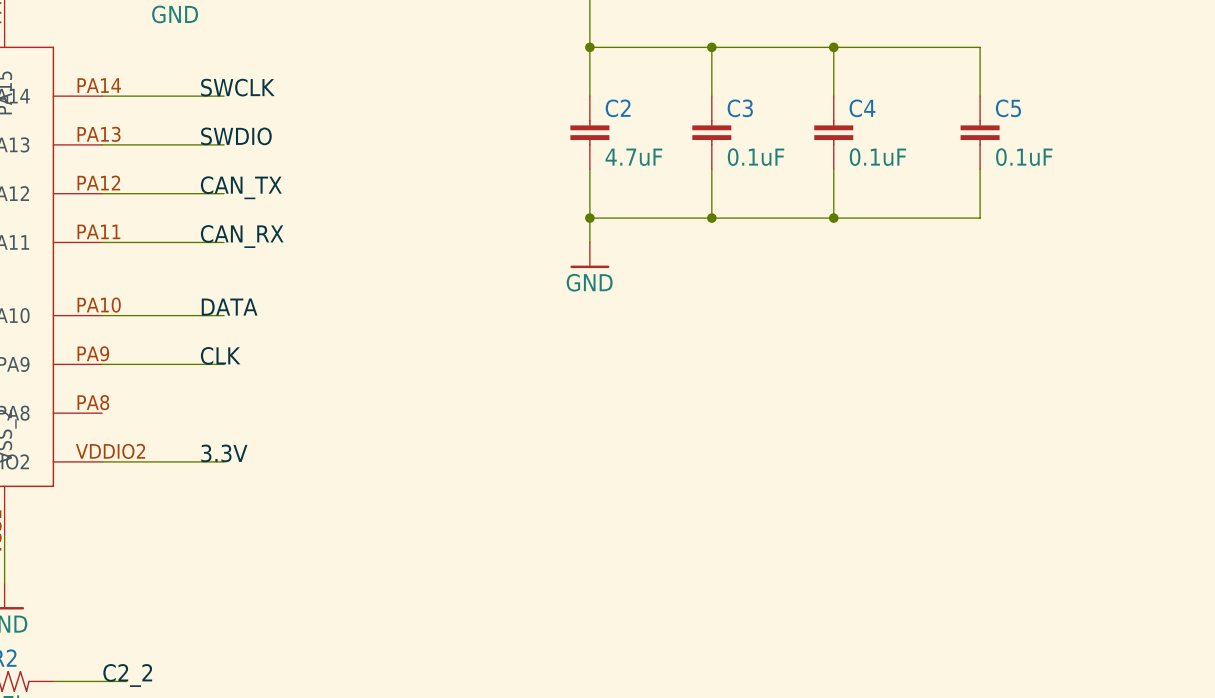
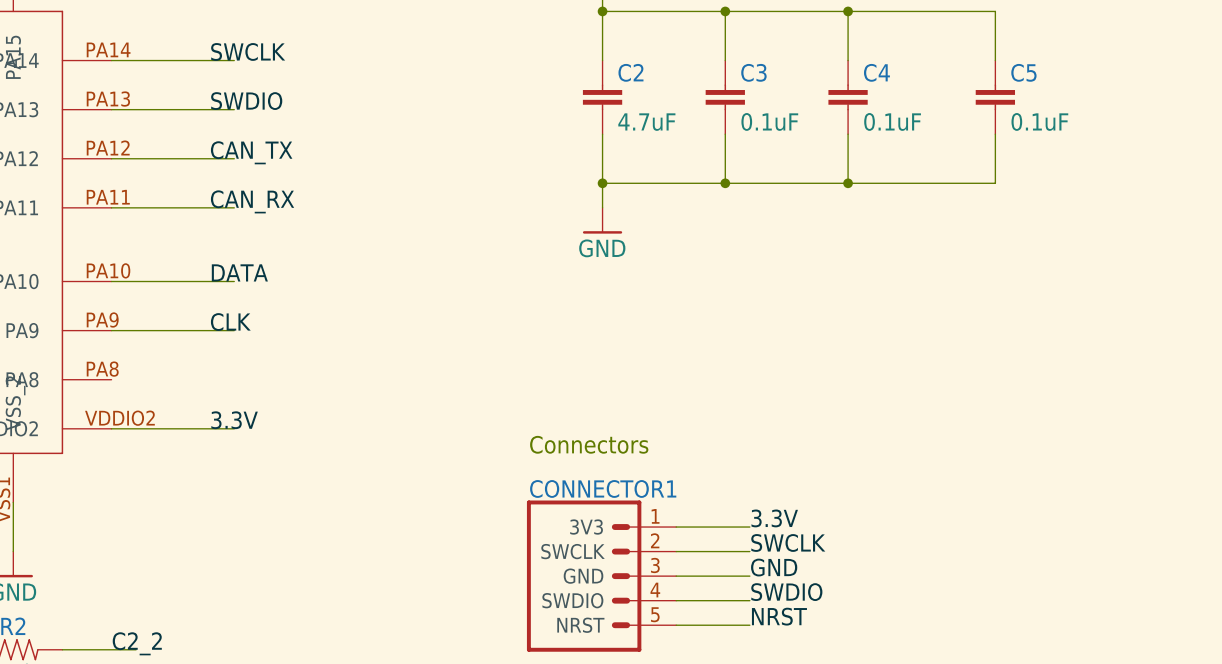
text: none -> Connectors (589, 444)
label: none -> 3.3V (774, 518)
wire: none -> (676, 527) (749, 527)
label: none -> SWCLK (788, 542)
wire: none -> (676, 551) (749, 551)
label: none -> GND (774, 567)
CONNECTOR1: none -> (601, 576)
wire: none -> (676, 576) (749, 576)
label: none -> SWDIO (786, 592)
wire: none -> (676, 600) (749, 600)
label: none -> NRST (779, 616)
wire: none -> (676, 625) (749, 625)

